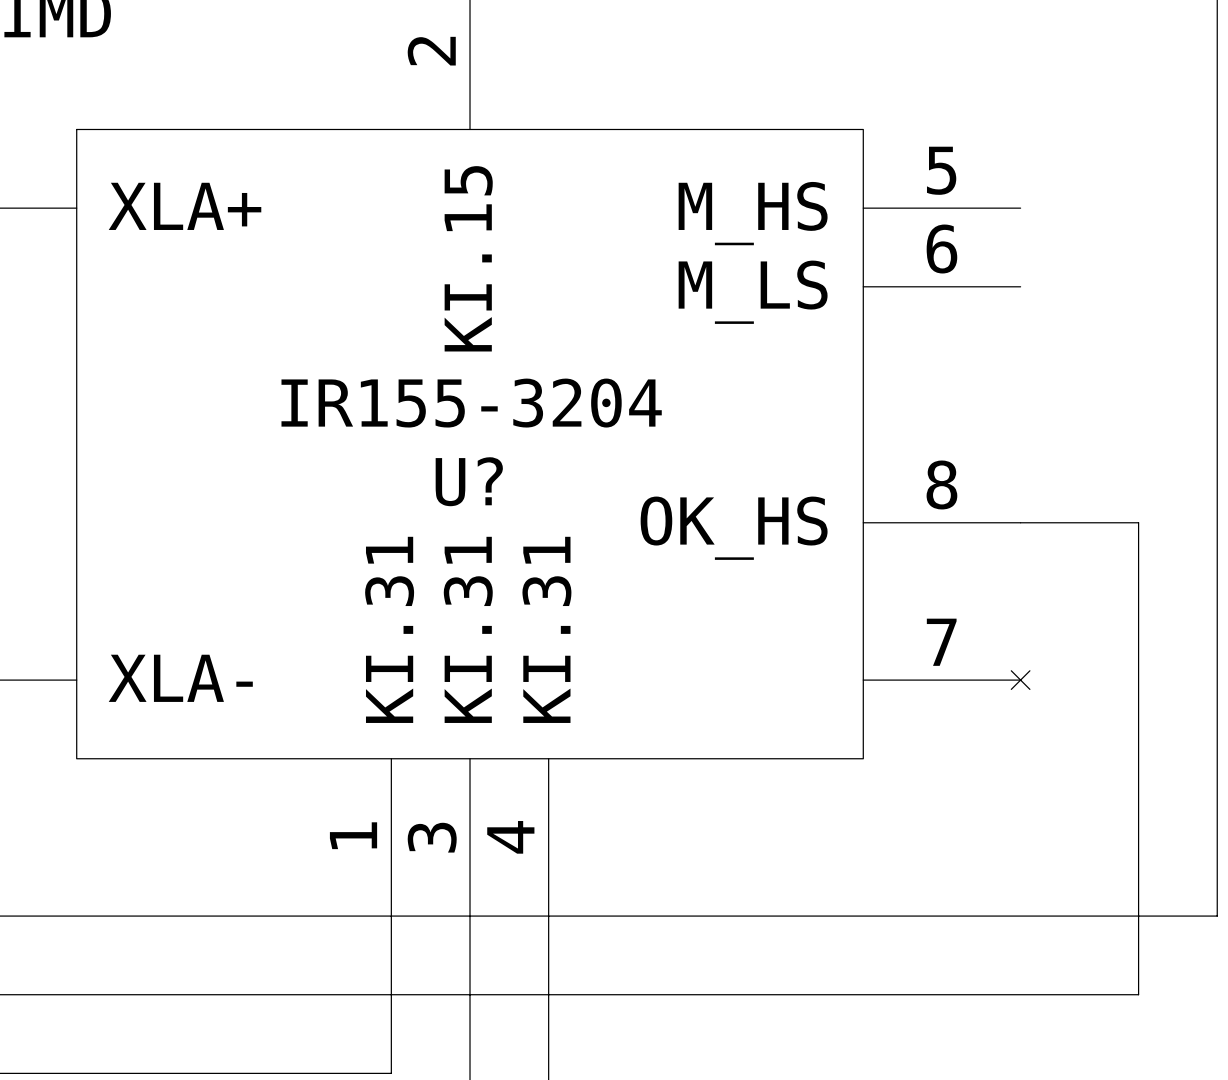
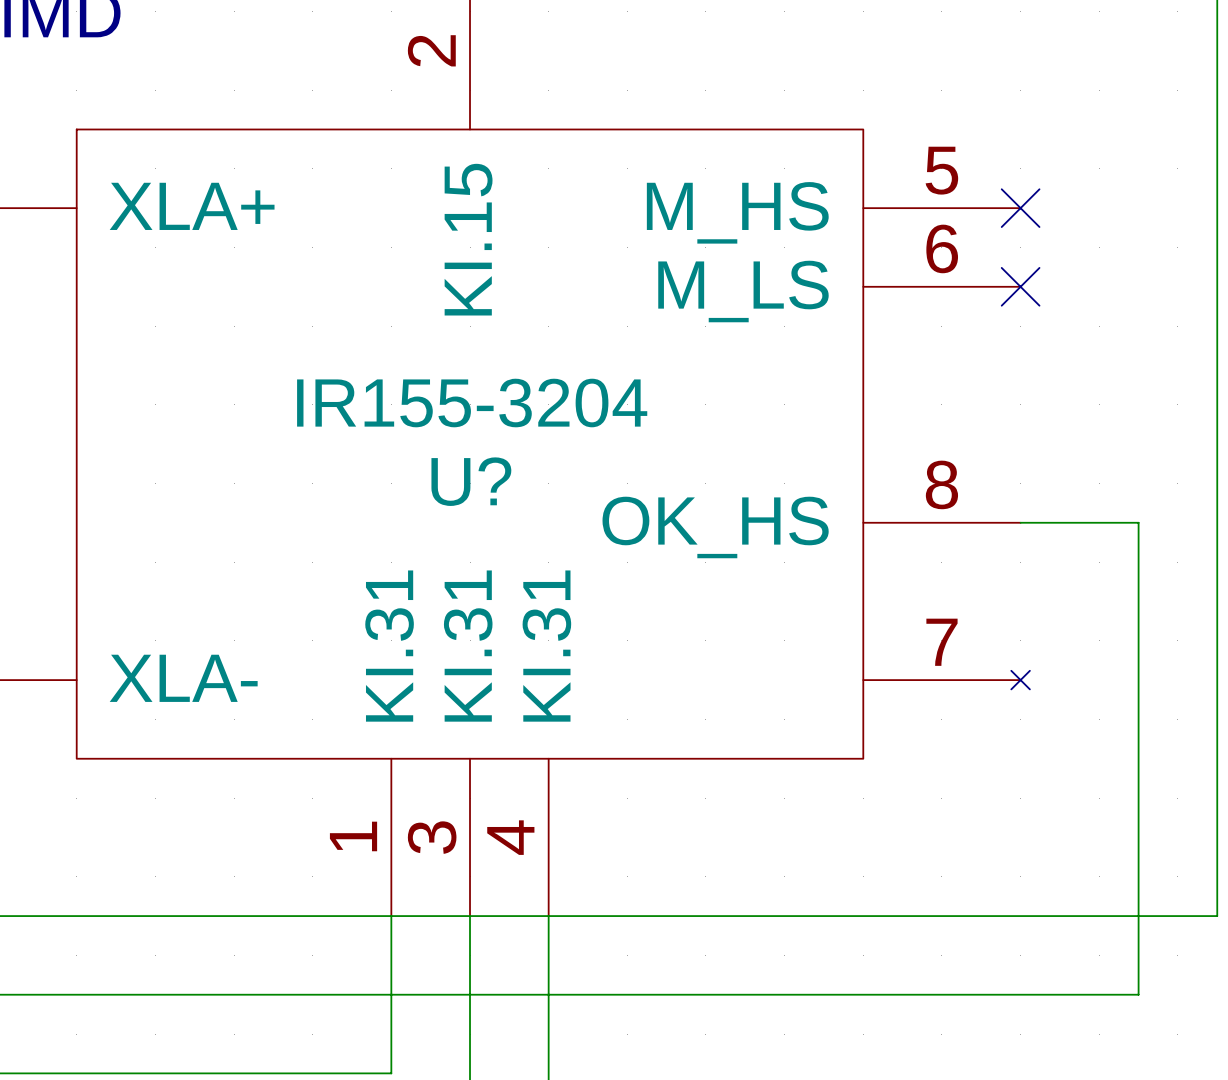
no-connect mark: none -> (1020, 208)
no-connect mark: none -> (1020, 286)

